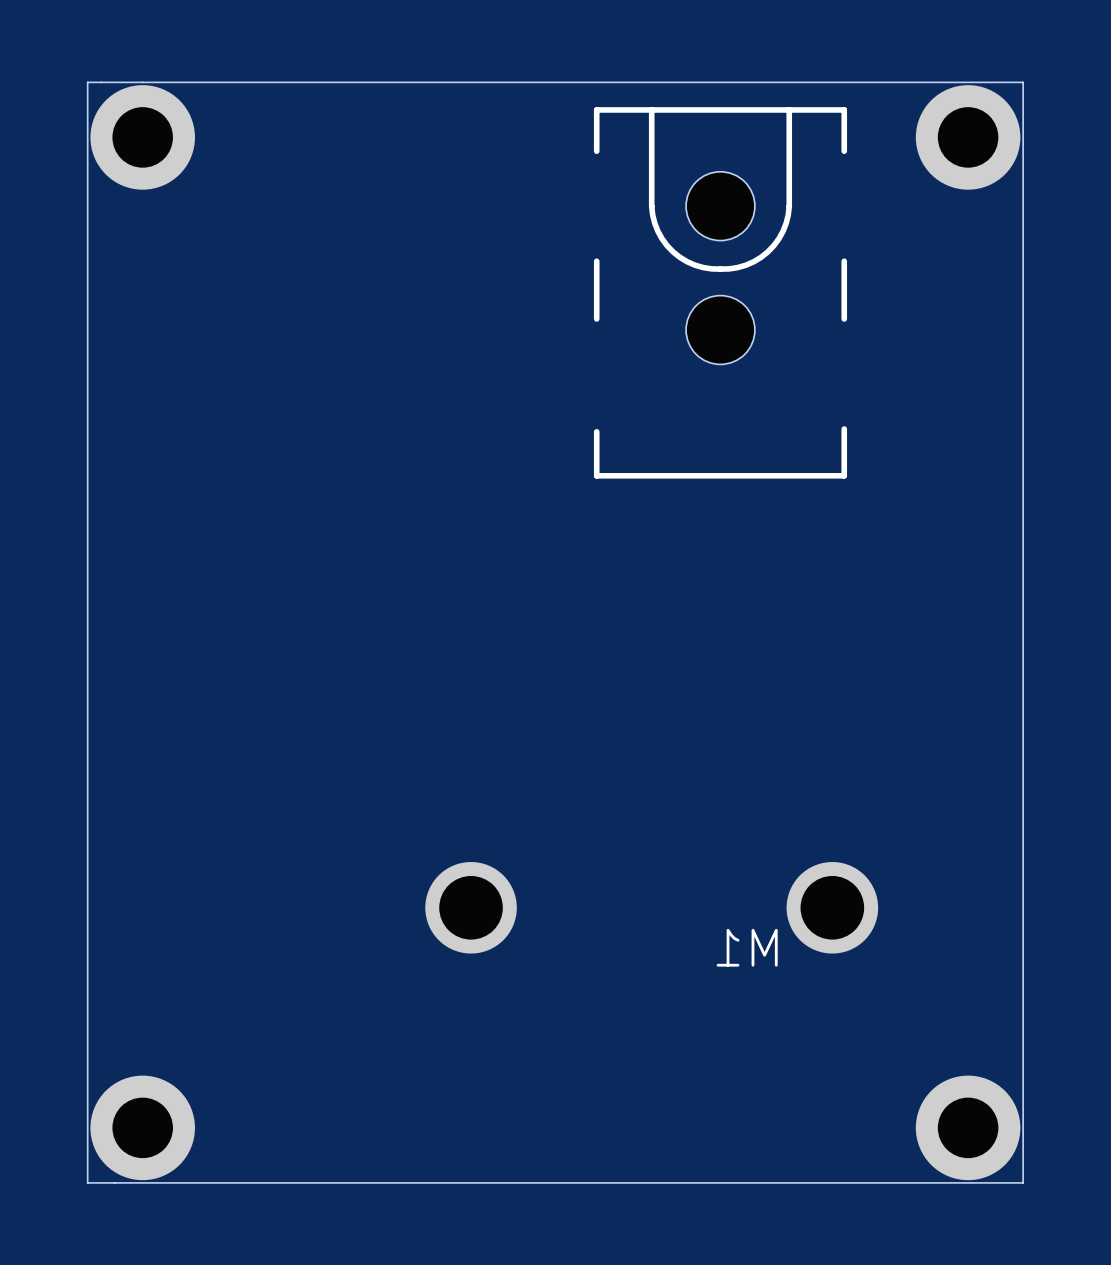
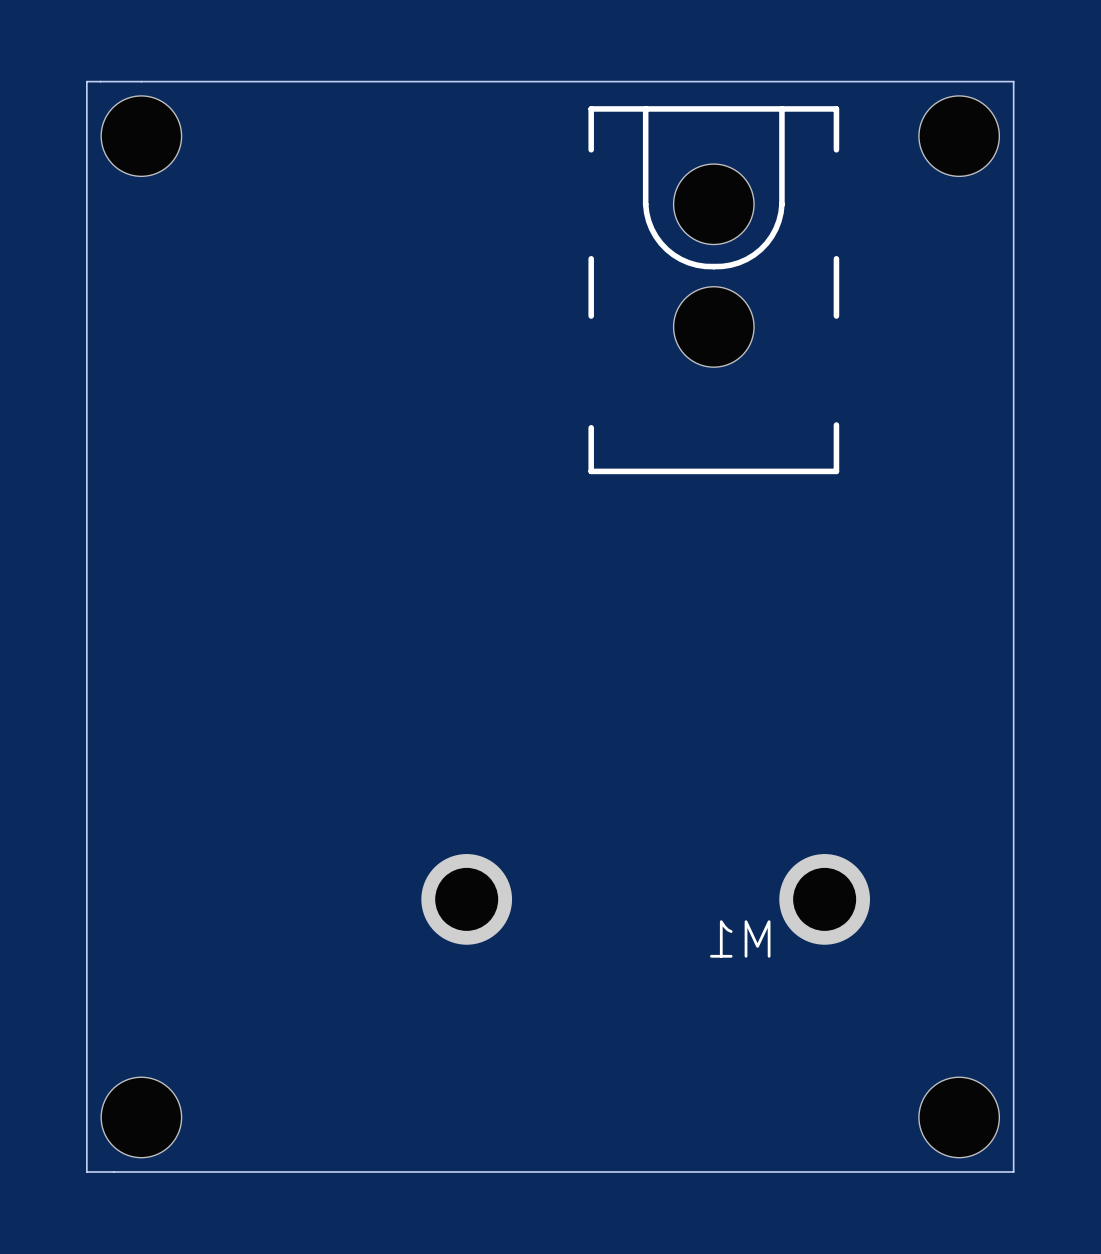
part: (142, 137) -> none
via: none -> (141, 136)
part: (968, 137) -> none
via: none -> (959, 136)
part: (720, 206) -> none
via: none -> (713, 204)
part: (720, 330) -> none
via: none -> (713, 326)
part: (142, 1127) -> none
via: none -> (141, 1117)
part: (968, 1127) -> none
via: none -> (959, 1117)

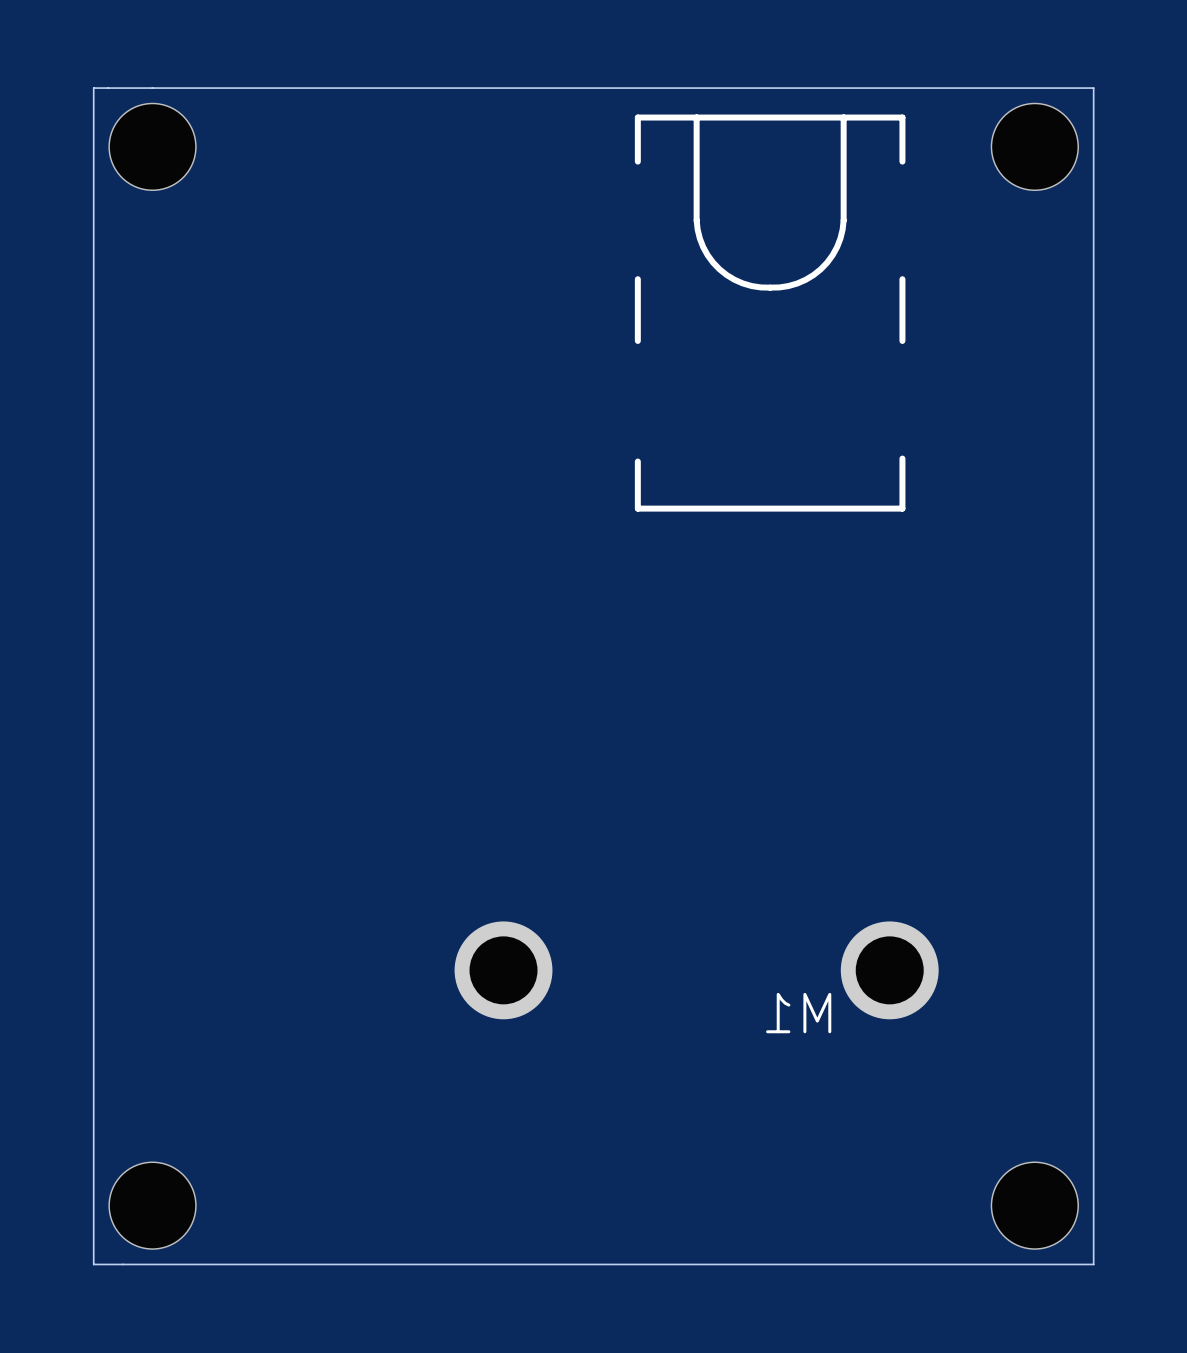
via: (713, 204) -> none
via: (713, 326) -> none

